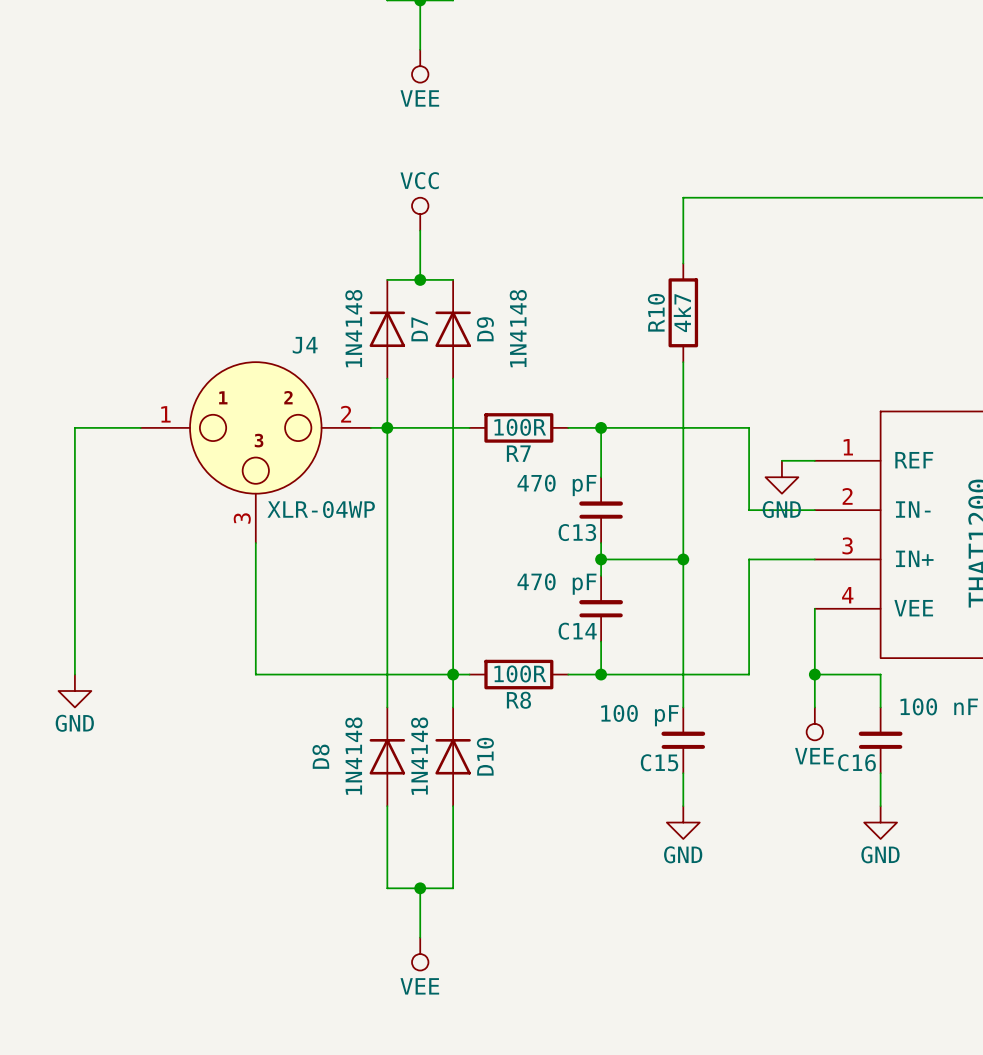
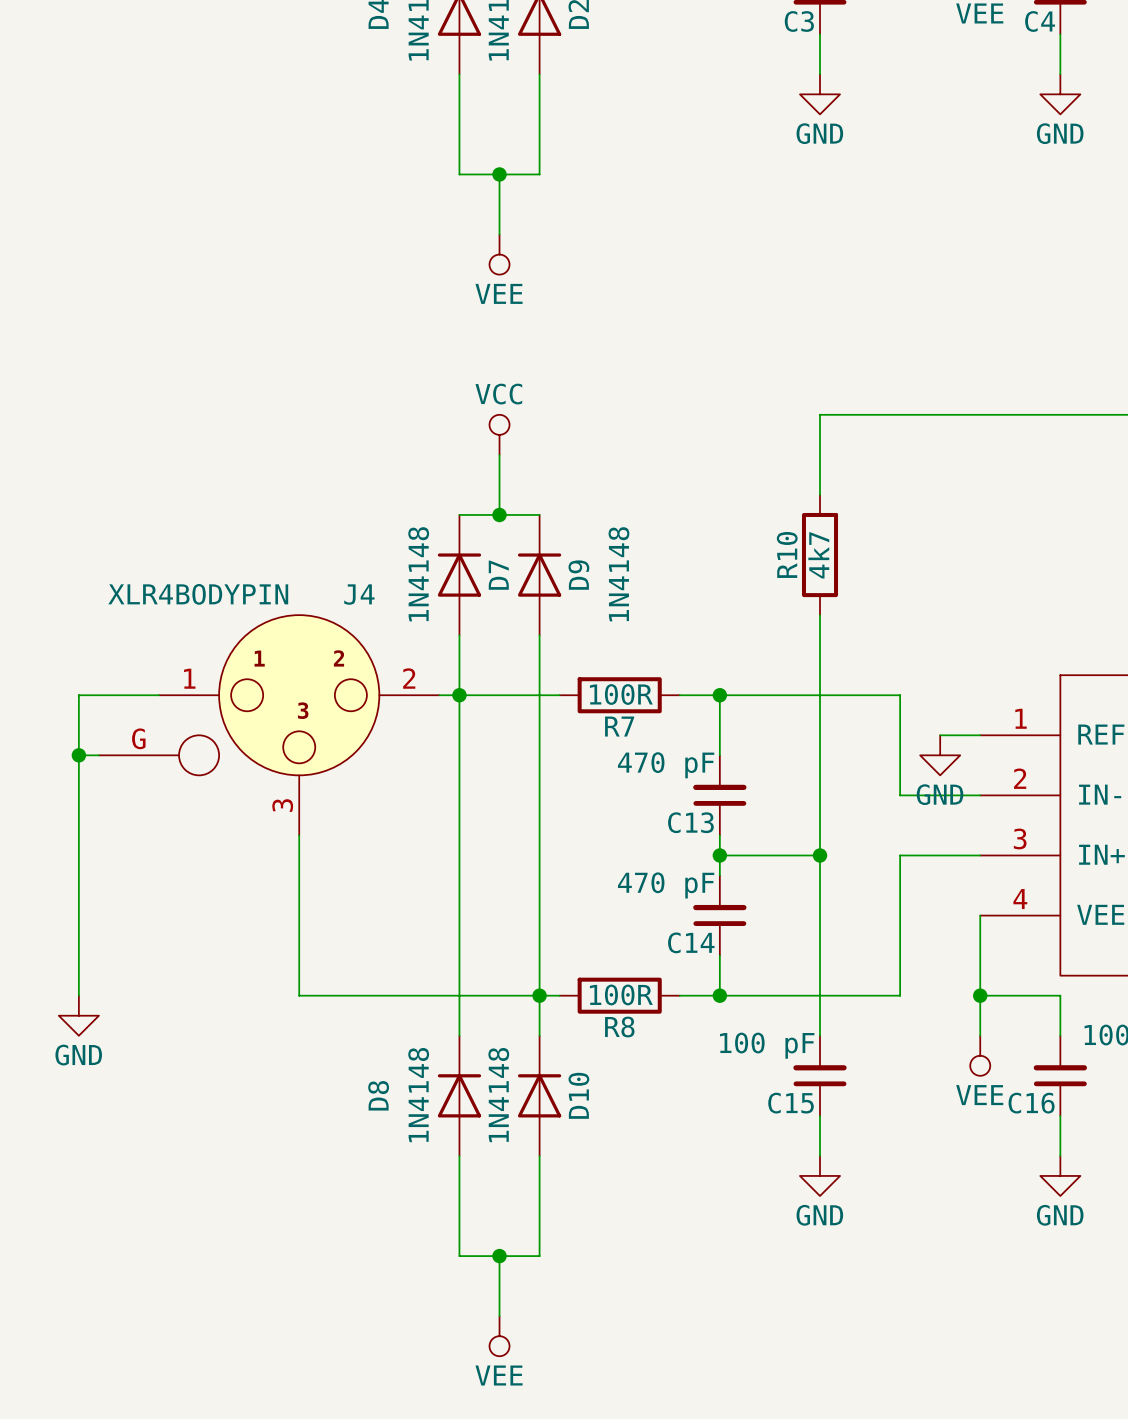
J4 symbol: [140, 362, 371, 544] -> [98, 615, 440, 836]
wire: none -> (78, 755) (98, 755)
junction: none -> (78, 755)
J4 value: XLR-04WP (321, 509) -> XLR4BODYPIN (198, 594)

